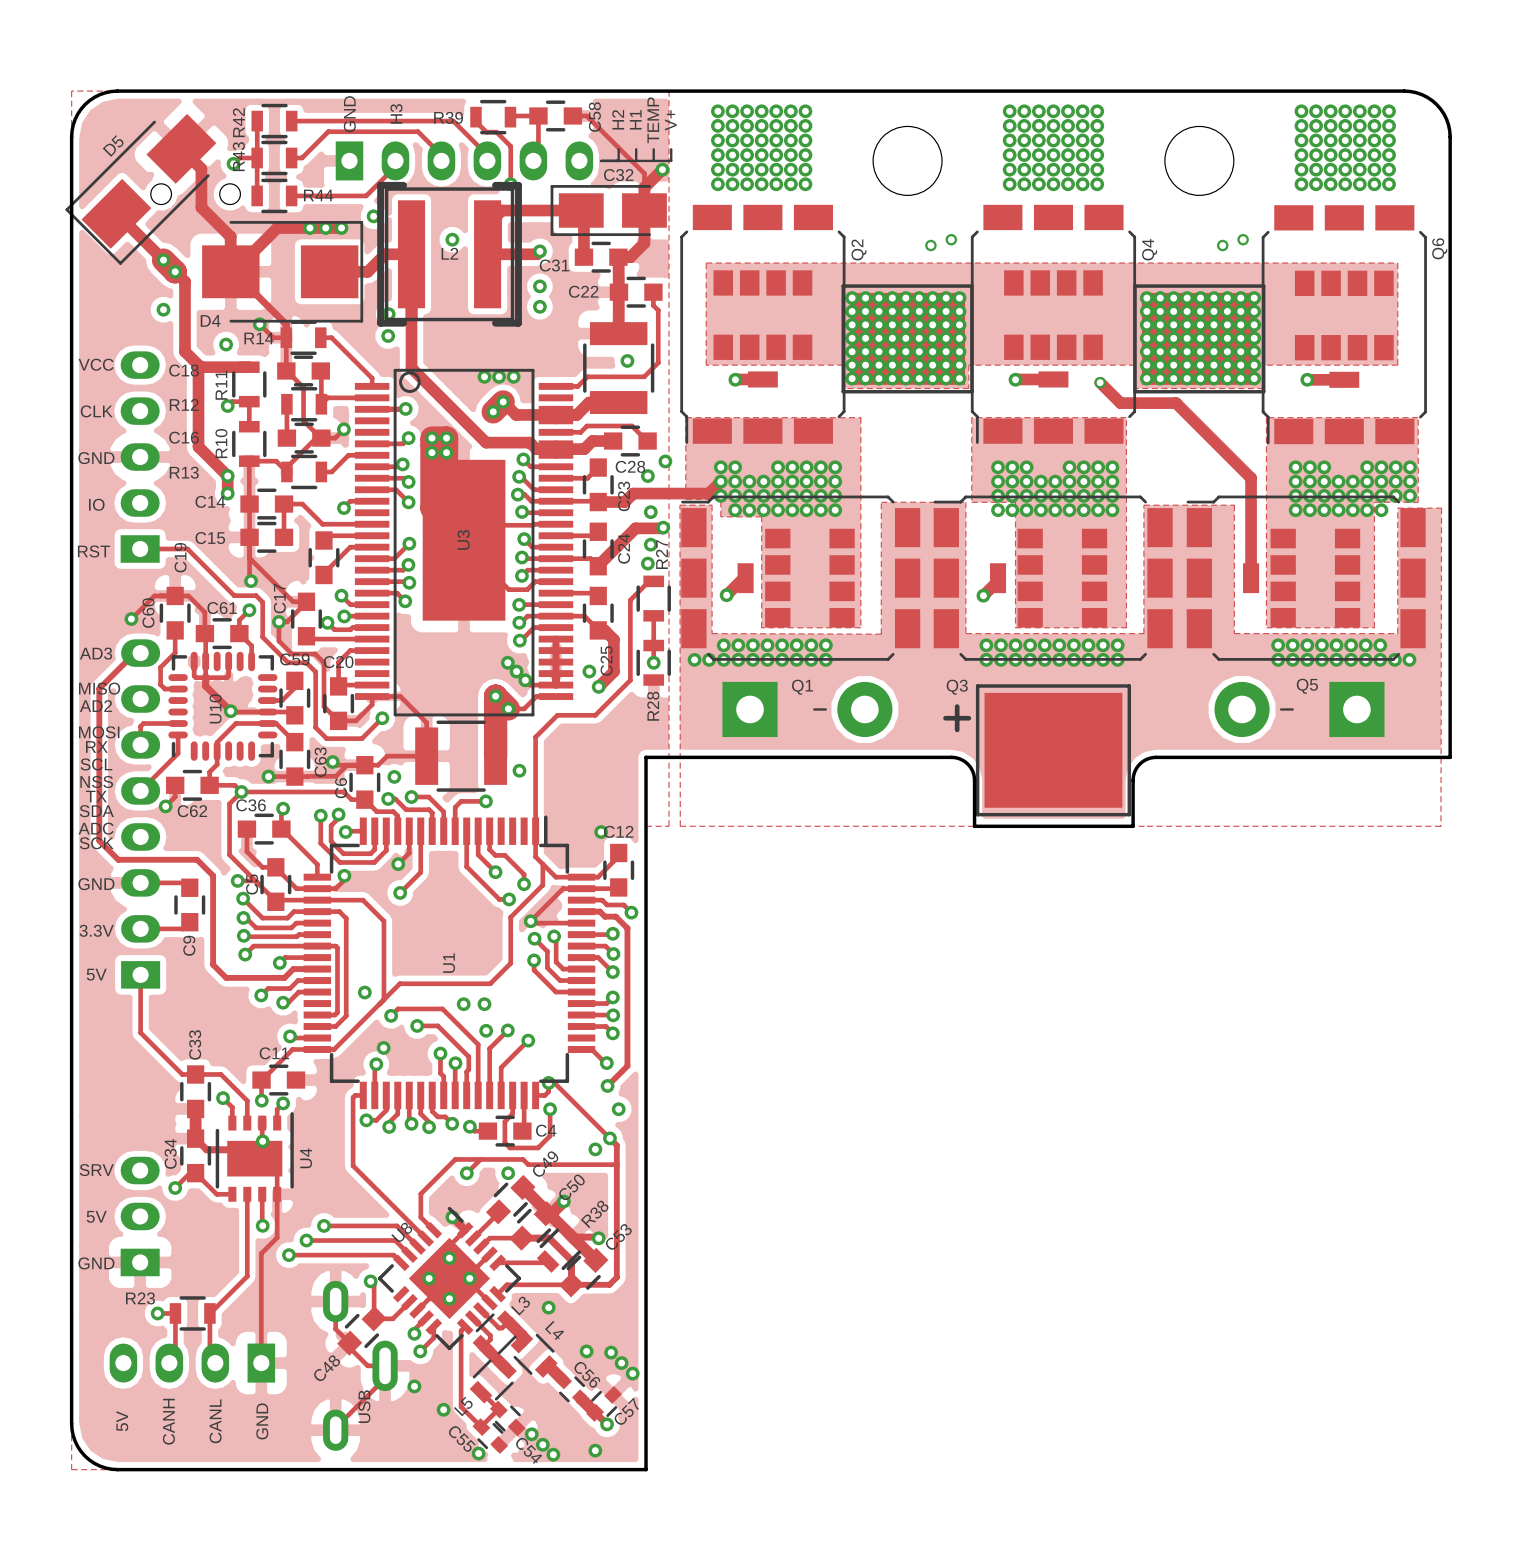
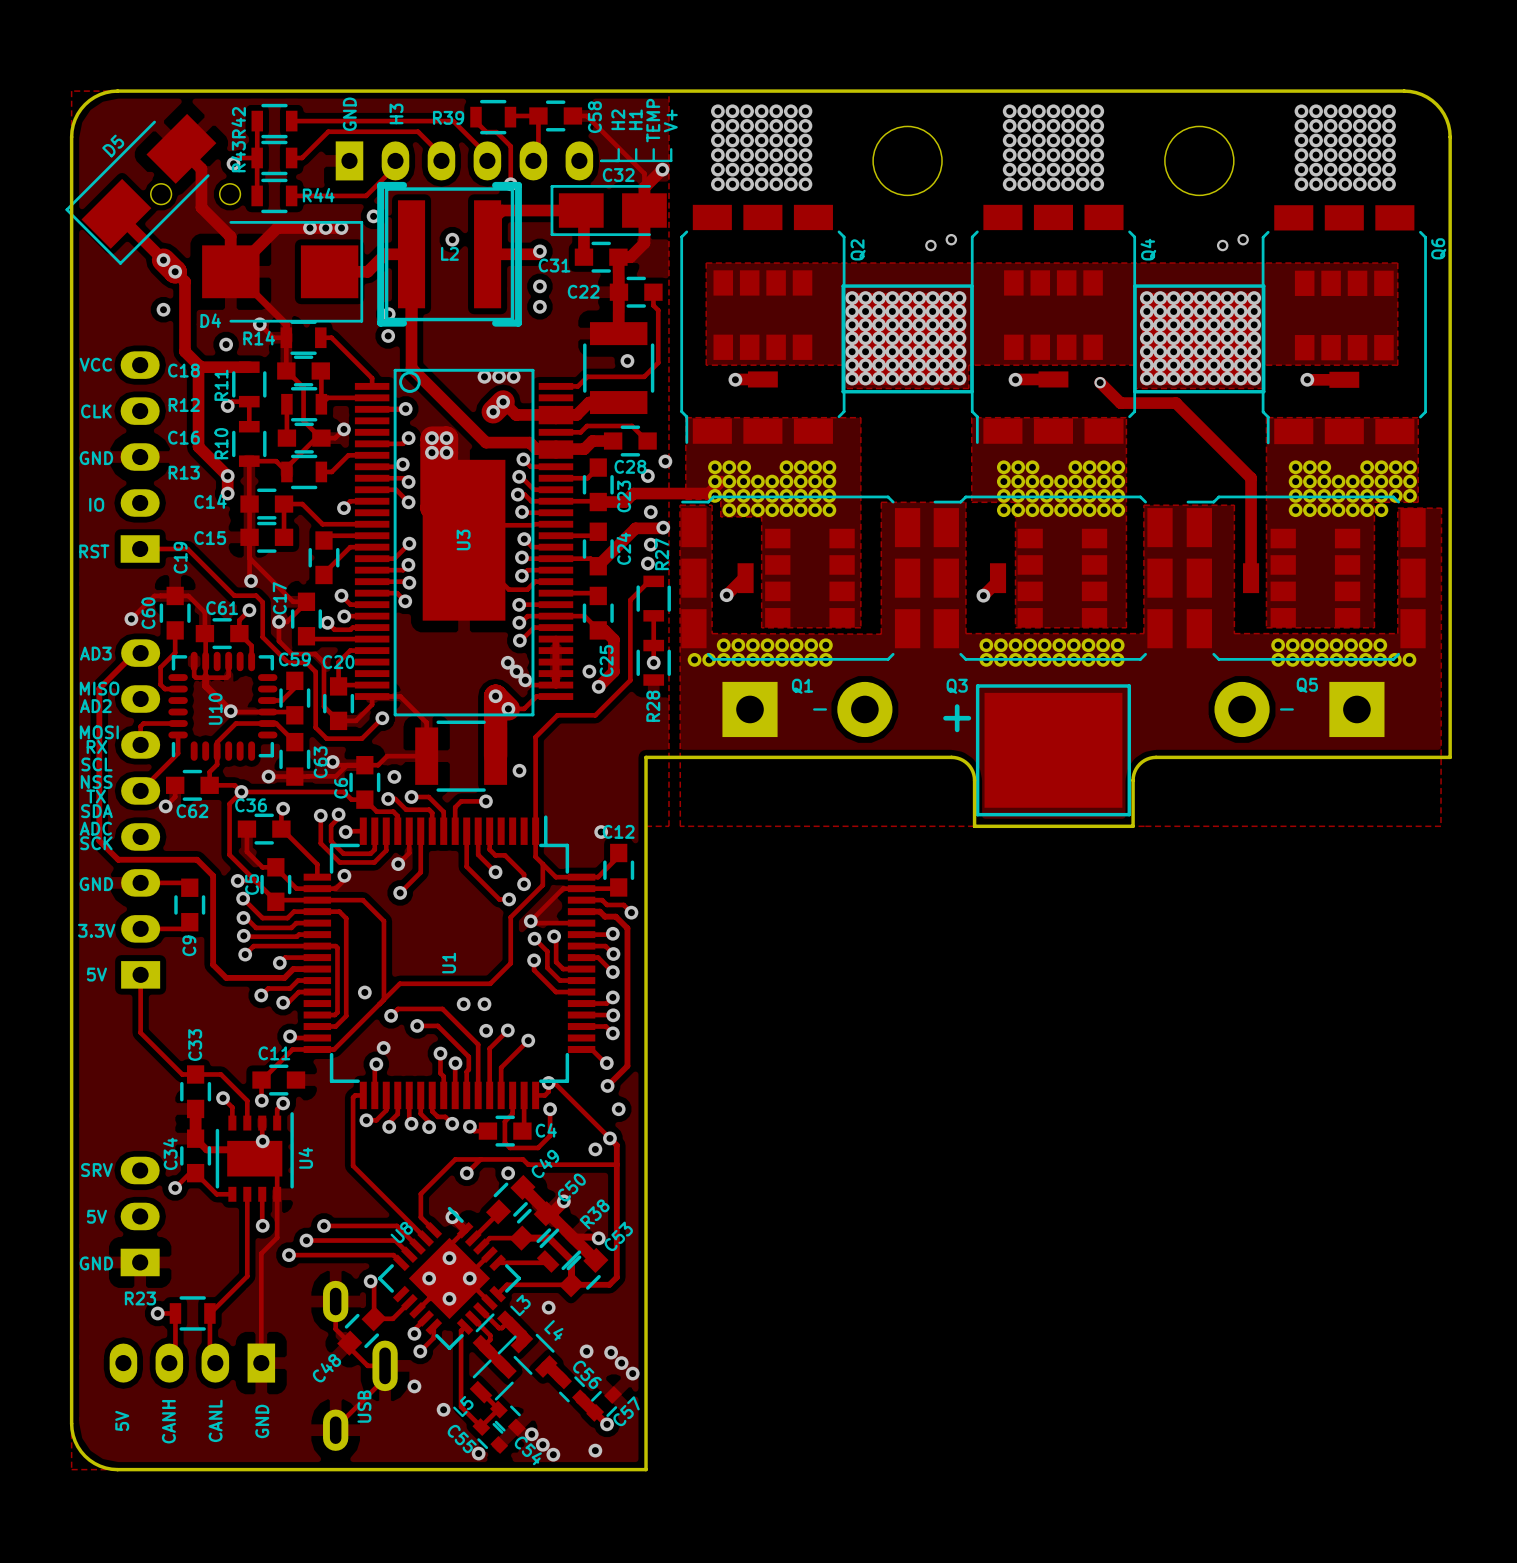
part: none -> (714, 467)
part: (720, 467) -> none
part: none -> (729, 467)
part: (735, 467) -> none
part: none -> (744, 467)
part: (778, 467) -> none
part: none -> (786, 467)
part: (792, 467) -> none
part: none -> (800, 467)
part: (806, 467) -> none
part: none -> (815, 467)
part: (820, 467) -> none
part: none -> (829, 467)
part: (835, 467) -> none
part: (998, 467) -> none
part: none -> (1003, 467)
part: (1012, 467) -> none
part: none -> (1018, 467)
part: (1026, 467) -> none
part: none -> (1032, 467)
part: (1069, 467) -> none
part: none -> (1075, 467)
part: (1083, 467) -> none
part: none -> (1089, 467)
part: (1098, 467) -> none
part: none -> (1103, 467)
part: (1112, 467) -> none
part: none -> (1118, 467)
part: none -> (714, 481)
part: (720, 481) -> none
part: none -> (729, 481)
part: (735, 481) -> none
part: none -> (743, 481)
part: (749, 481) -> none
part: none -> (757, 481)
part: (763, 481) -> none
part: none -> (772, 481)
part: (778, 481) -> none
part: none -> (786, 481)
part: (792, 481) -> none
part: none -> (800, 481)
part: (806, 481) -> none
part: none -> (815, 481)
part: (820, 481) -> none
part: none -> (829, 481)
part: (835, 481) -> none
part: (998, 481) -> none
part: none -> (1003, 481)
part: (1012, 481) -> none
part: none -> (1018, 481)
part: (1026, 481) -> none
part: none -> (1032, 481)
part: (1040, 481) -> none
part: none -> (1046, 481)
part: (1055, 481) -> none
part: none -> (1061, 481)
part: (1069, 481) -> none
part: none -> (1075, 481)
part: (1083, 481) -> none
part: none -> (1089, 481)
part: (1098, 481) -> none
part: none -> (1103, 481)
part: (1112, 481) -> none
part: none -> (1118, 481)
part: none -> (714, 495)
part: (720, 495) -> none
part: none -> (729, 495)
part: (735, 495) -> none
part: none -> (743, 495)
part: (749, 495) -> none
part: none -> (757, 495)
part: (763, 495) -> none
part: none -> (772, 495)
part: (778, 495) -> none
part: none -> (786, 495)
part: (792, 495) -> none
part: none -> (800, 495)
part: (806, 495) -> none
part: none -> (815, 495)
part: (820, 495) -> none
part: none -> (829, 495)
part: (835, 495) -> none
part: (998, 495) -> none
part: none -> (1003, 495)
part: (1012, 495) -> none
part: none -> (1018, 495)
part: (1026, 495) -> none
part: none -> (1032, 495)
part: (1040, 495) -> none
part: none -> (1046, 495)
part: (1055, 495) -> none
part: none -> (1061, 495)
part: (1069, 495) -> none
part: none -> (1075, 495)
part: (1083, 495) -> none
part: none -> (1089, 495)
part: (1098, 495) -> none
part: none -> (1103, 495)
part: (1112, 495) -> none
part: none -> (1118, 495)
part: none -> (729, 510)
part: (735, 510) -> none
part: none -> (743, 510)
part: (749, 510) -> none
part: none -> (757, 510)
part: (763, 510) -> none
part: none -> (772, 510)
part: (778, 510) -> none
part: none -> (786, 510)
part: (792, 510) -> none
part: none -> (800, 510)
part: (806, 510) -> none
part: none -> (815, 510)
part: (820, 510) -> none
part: none -> (829, 510)
part: (835, 510) -> none
part: (998, 510) -> none
part: none -> (1003, 510)
part: (1012, 510) -> none
part: none -> (1018, 510)
part: (1026, 510) -> none
part: none -> (1032, 510)
part: (1040, 510) -> none
part: none -> (1046, 510)
part: (1055, 510) -> none
part: none -> (1061, 510)
part: (1069, 510) -> none
part: none -> (1075, 510)
part: (1083, 510) -> none
part: none -> (1089, 510)
part: (1098, 510) -> none
part: none -> (1103, 510)
part: (1112, 510) -> none
part: none -> (1118, 510)

